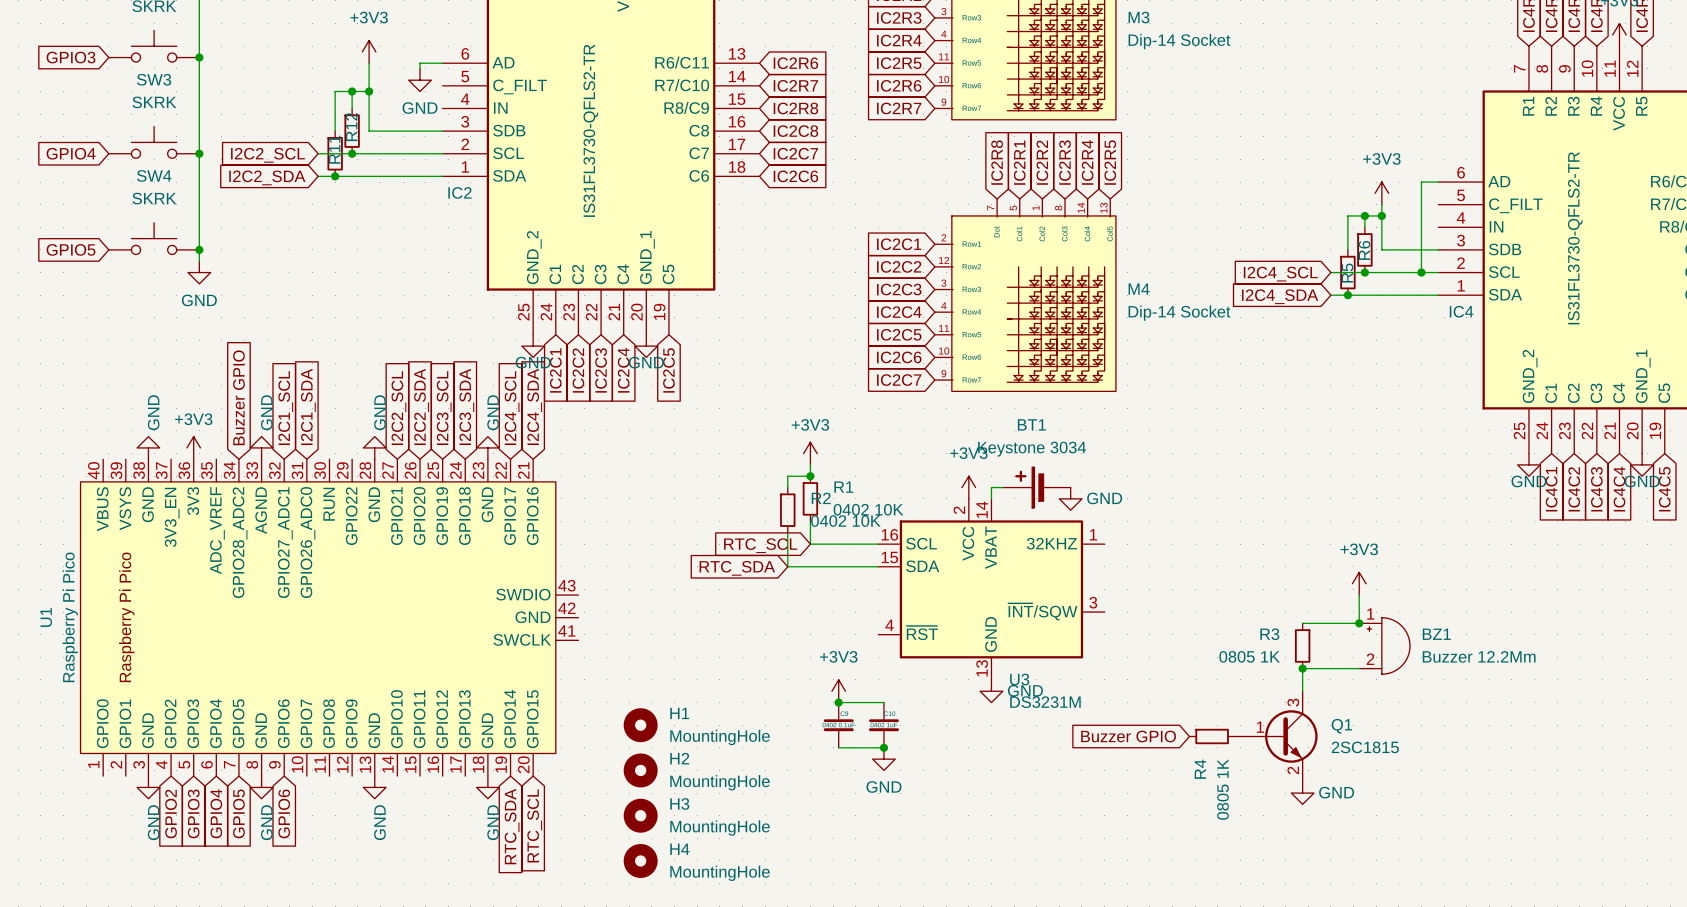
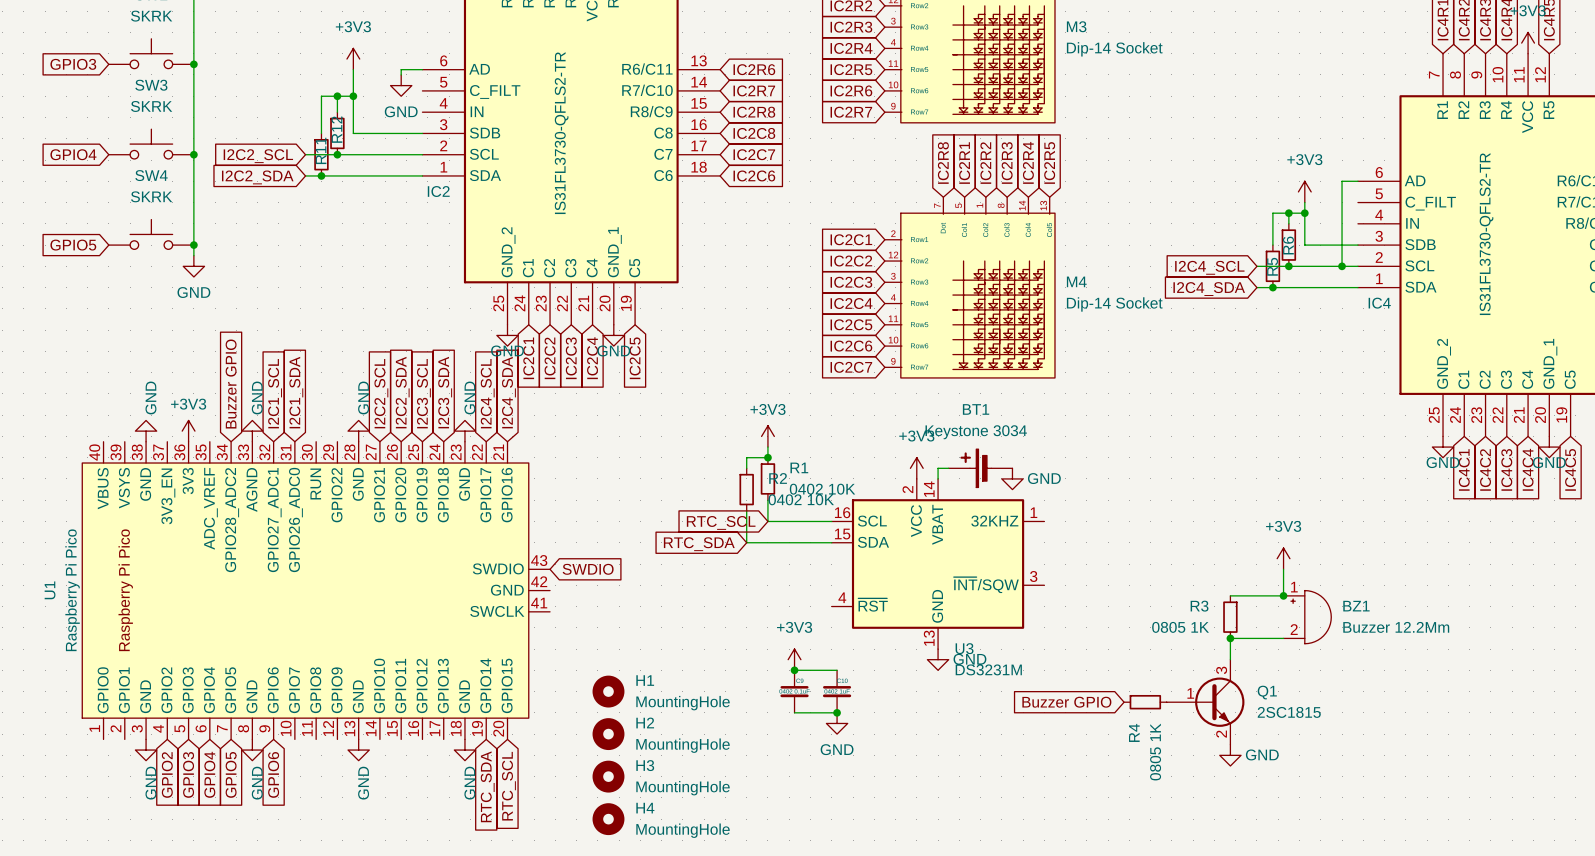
global label: none -> SWDIO (588, 569)

